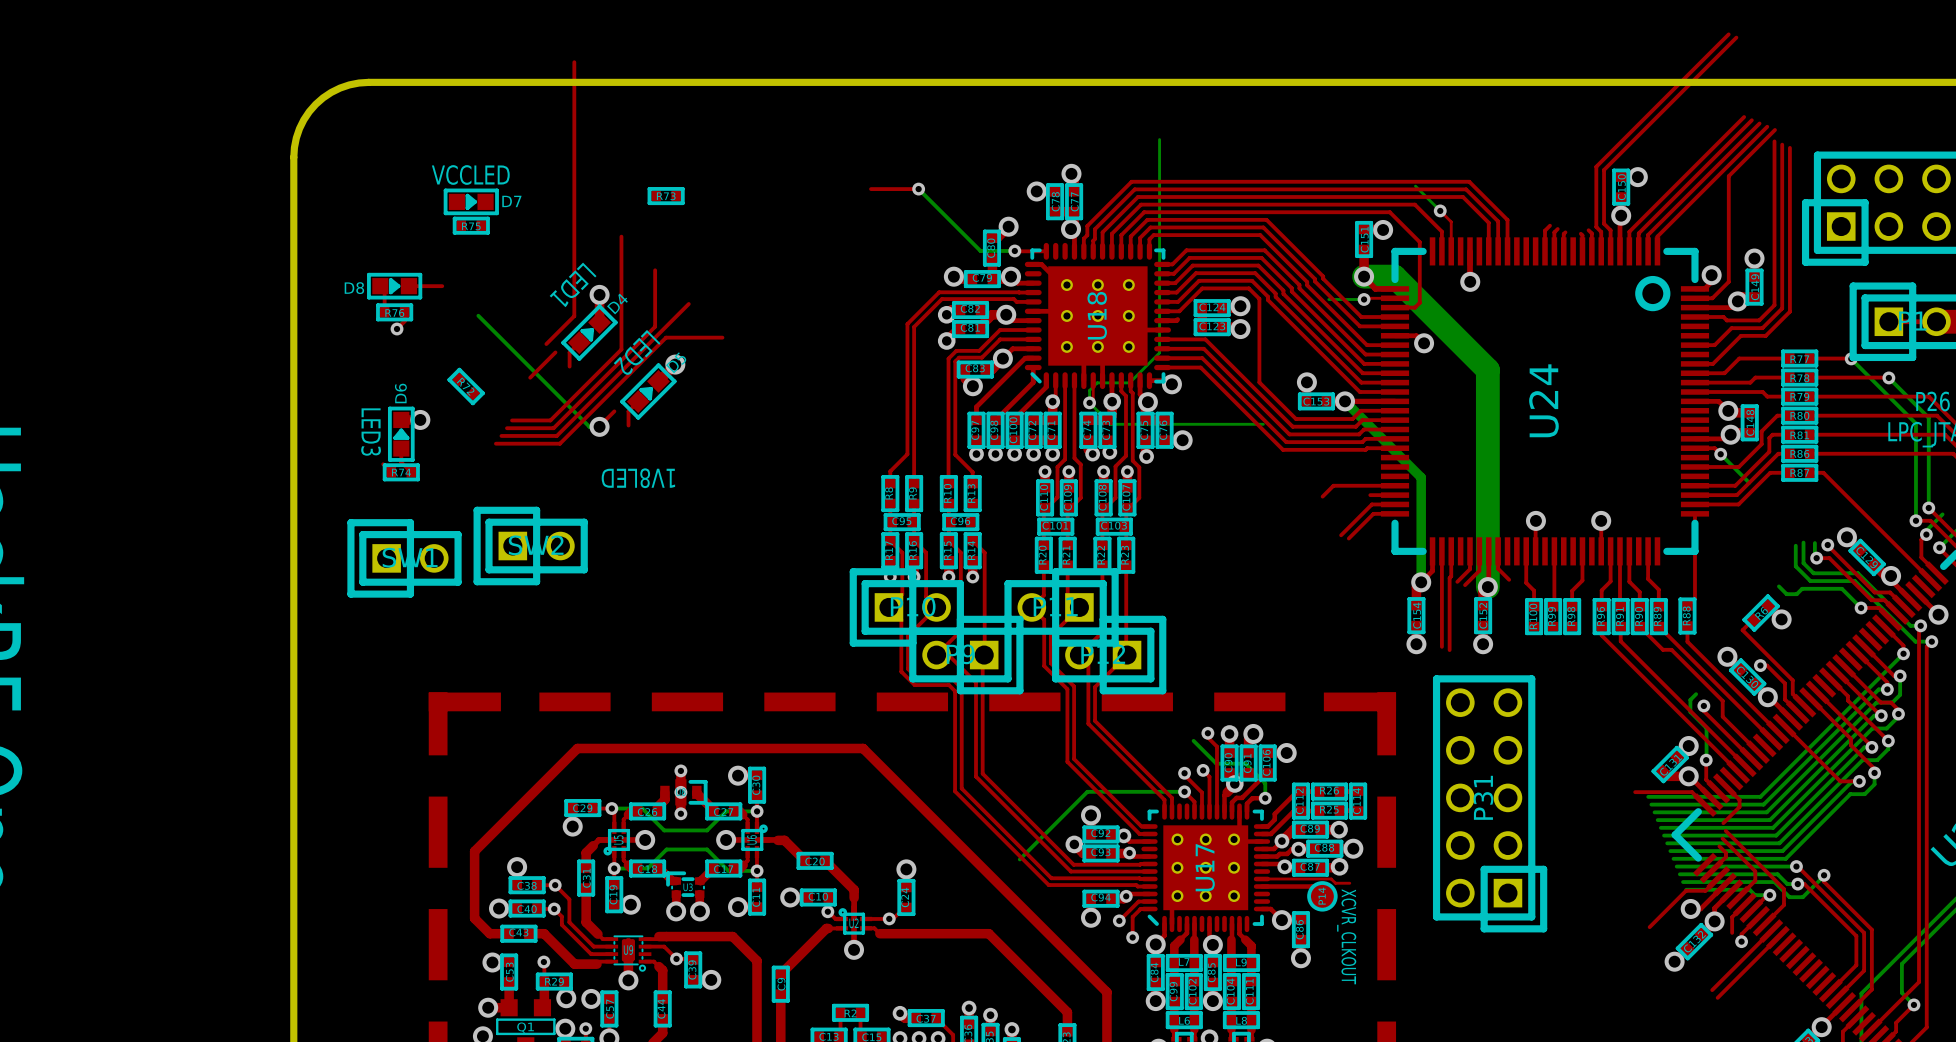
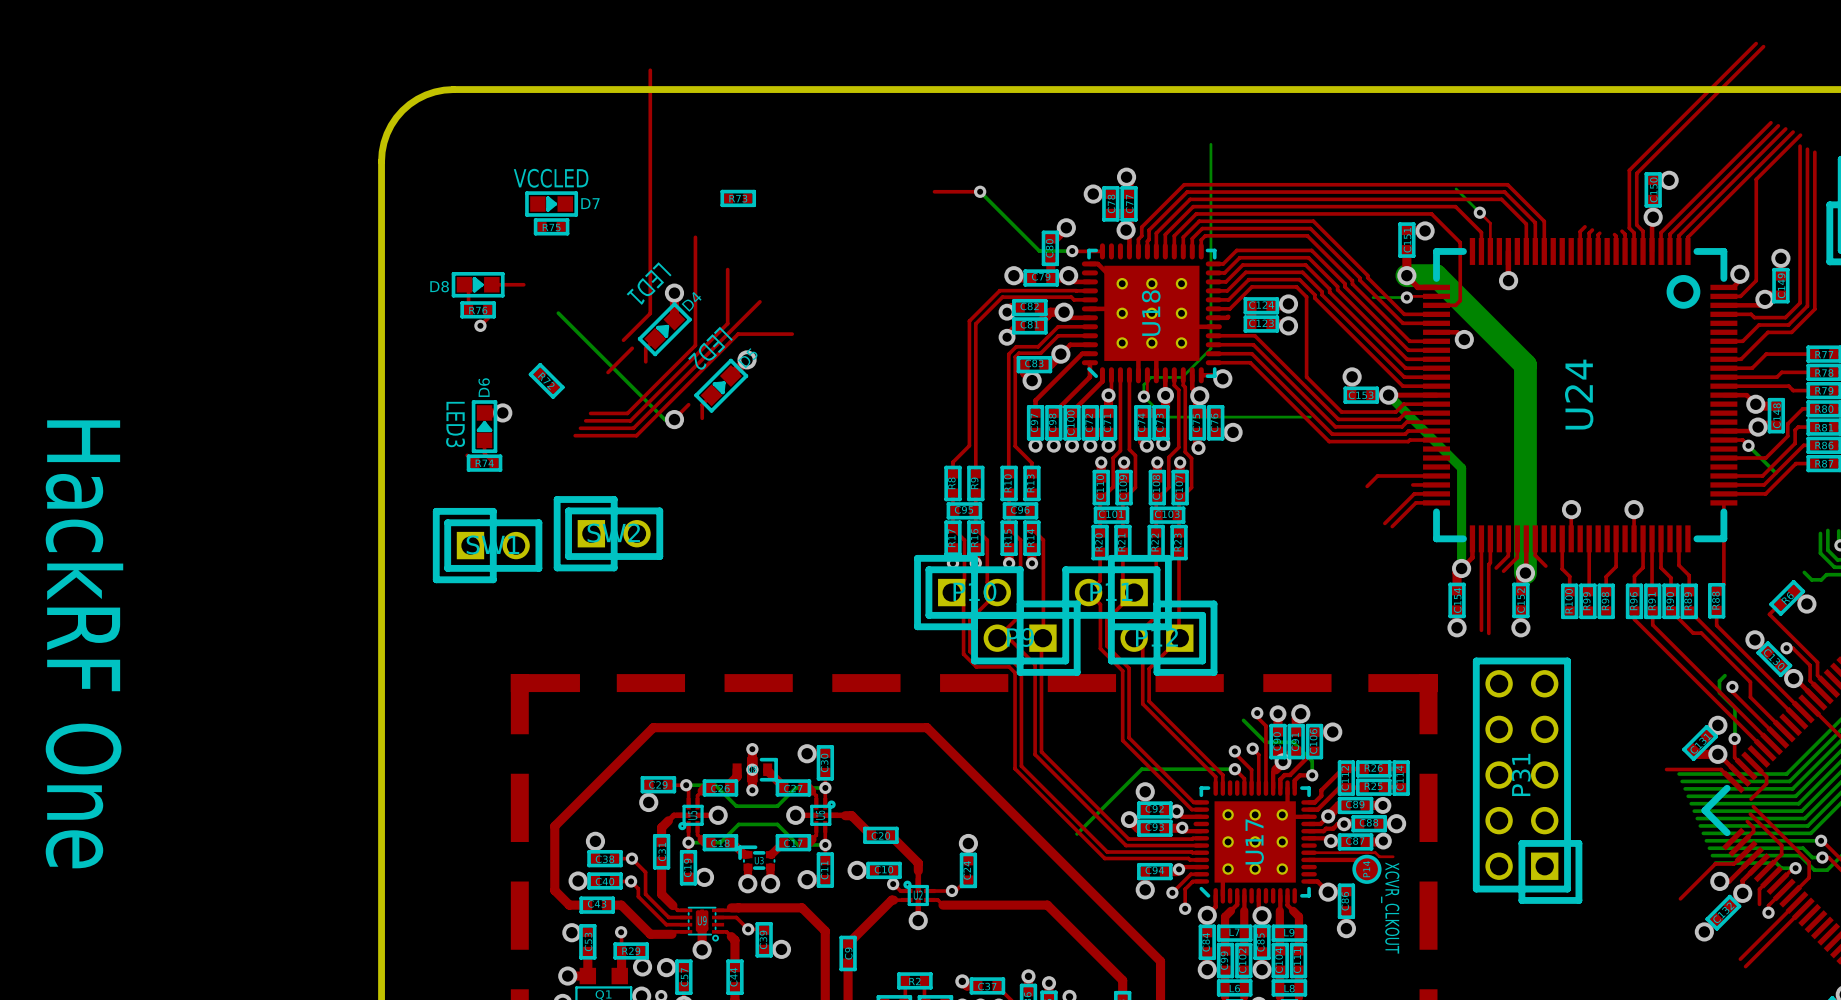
text: 1V8LED (638, 478) -> none

